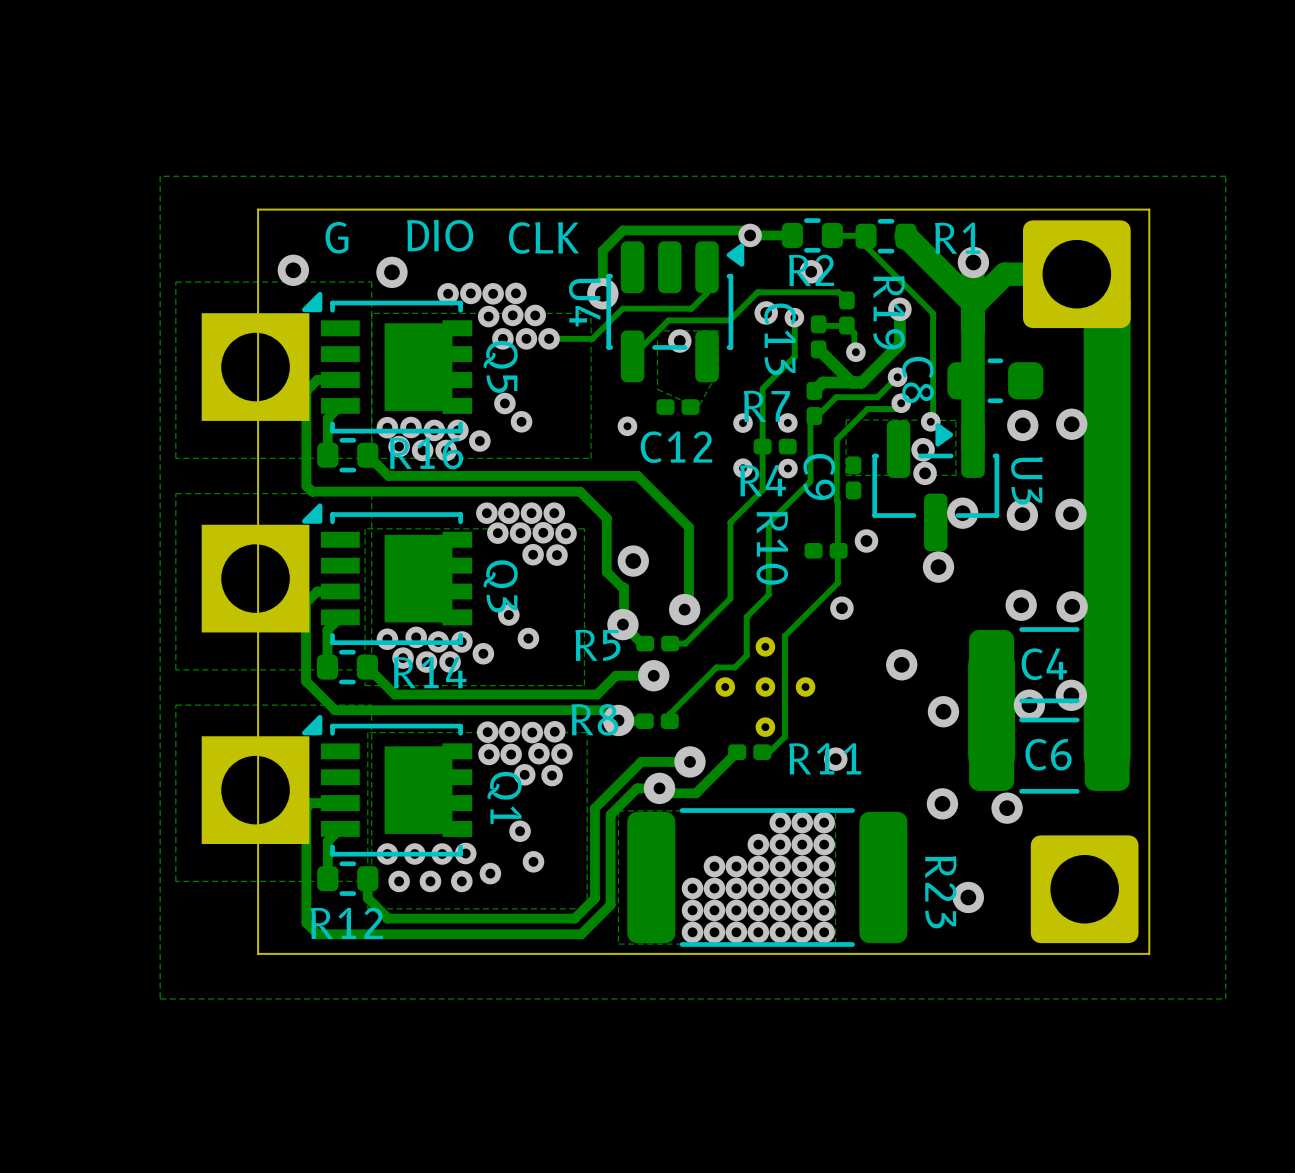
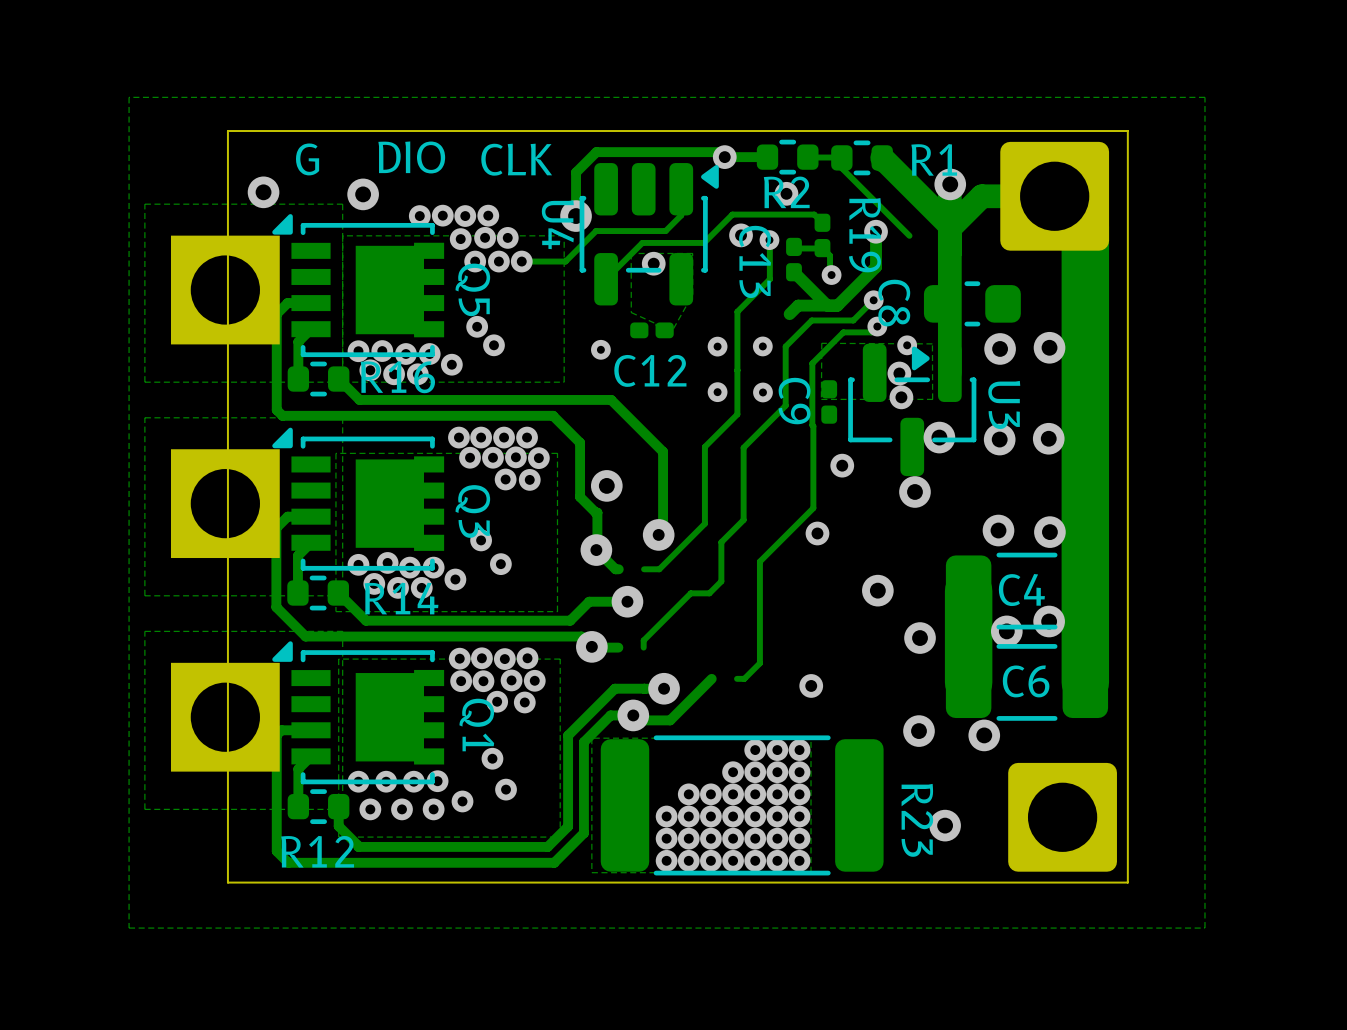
track: (933, 313) (933, 417) -> none
R7: (814, 403) -> none
R4: (775, 446) -> none
R10: (826, 550) -> none
R5: (657, 643) -> none
part: (765, 687) -> none
R8: (657, 721) -> none
R11: (749, 752) -> none

